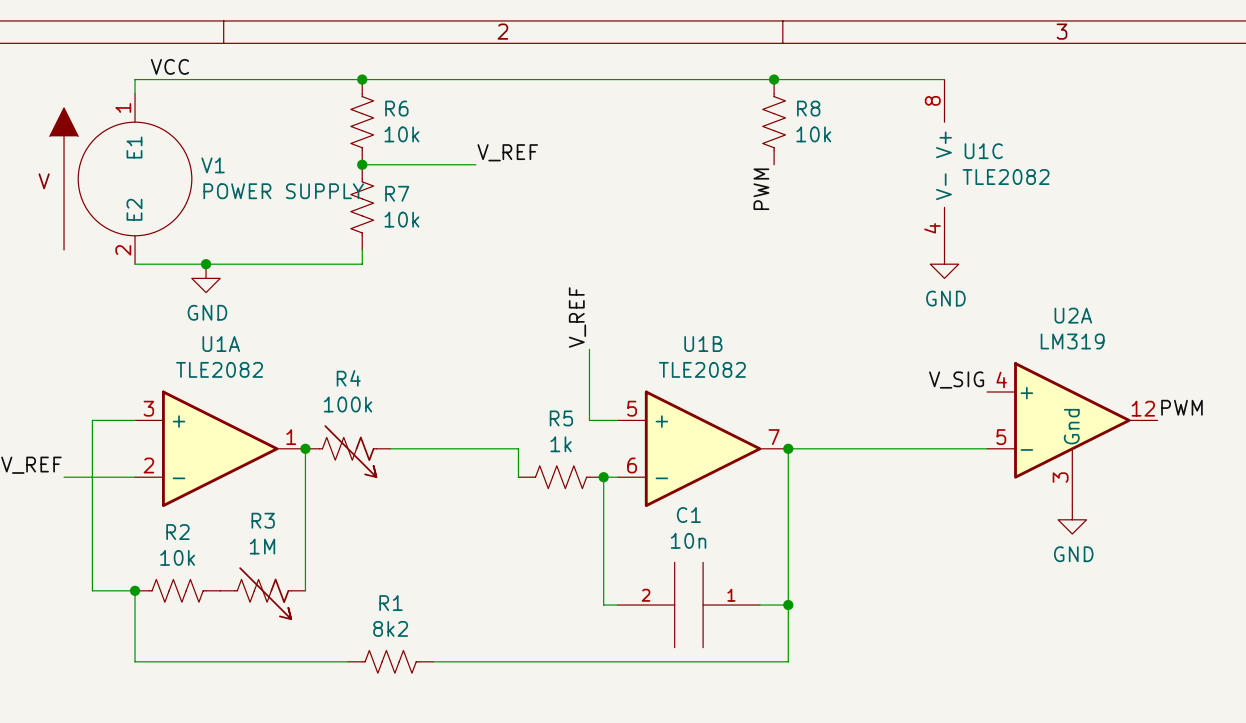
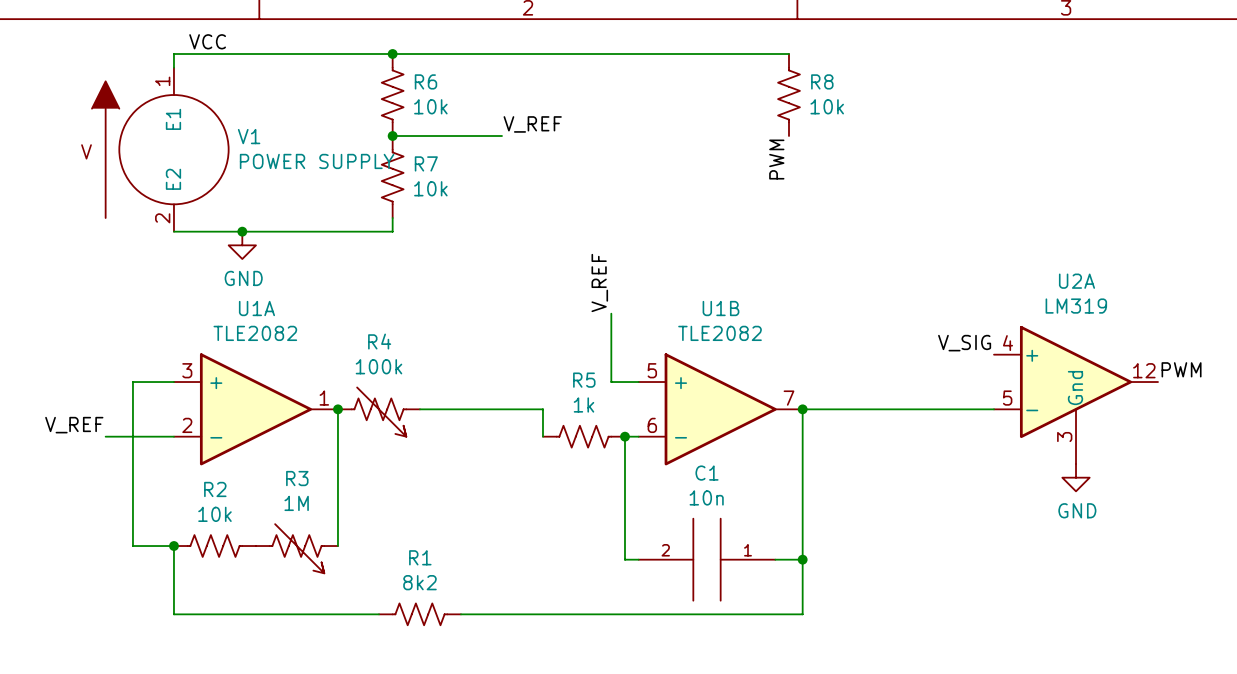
wire: (774, 79) (944, 79) -> none
junction: (774, 79) -> none
U1C: TLE2082 (944, 164) -> none
power symbol: GND (944, 264) -> none

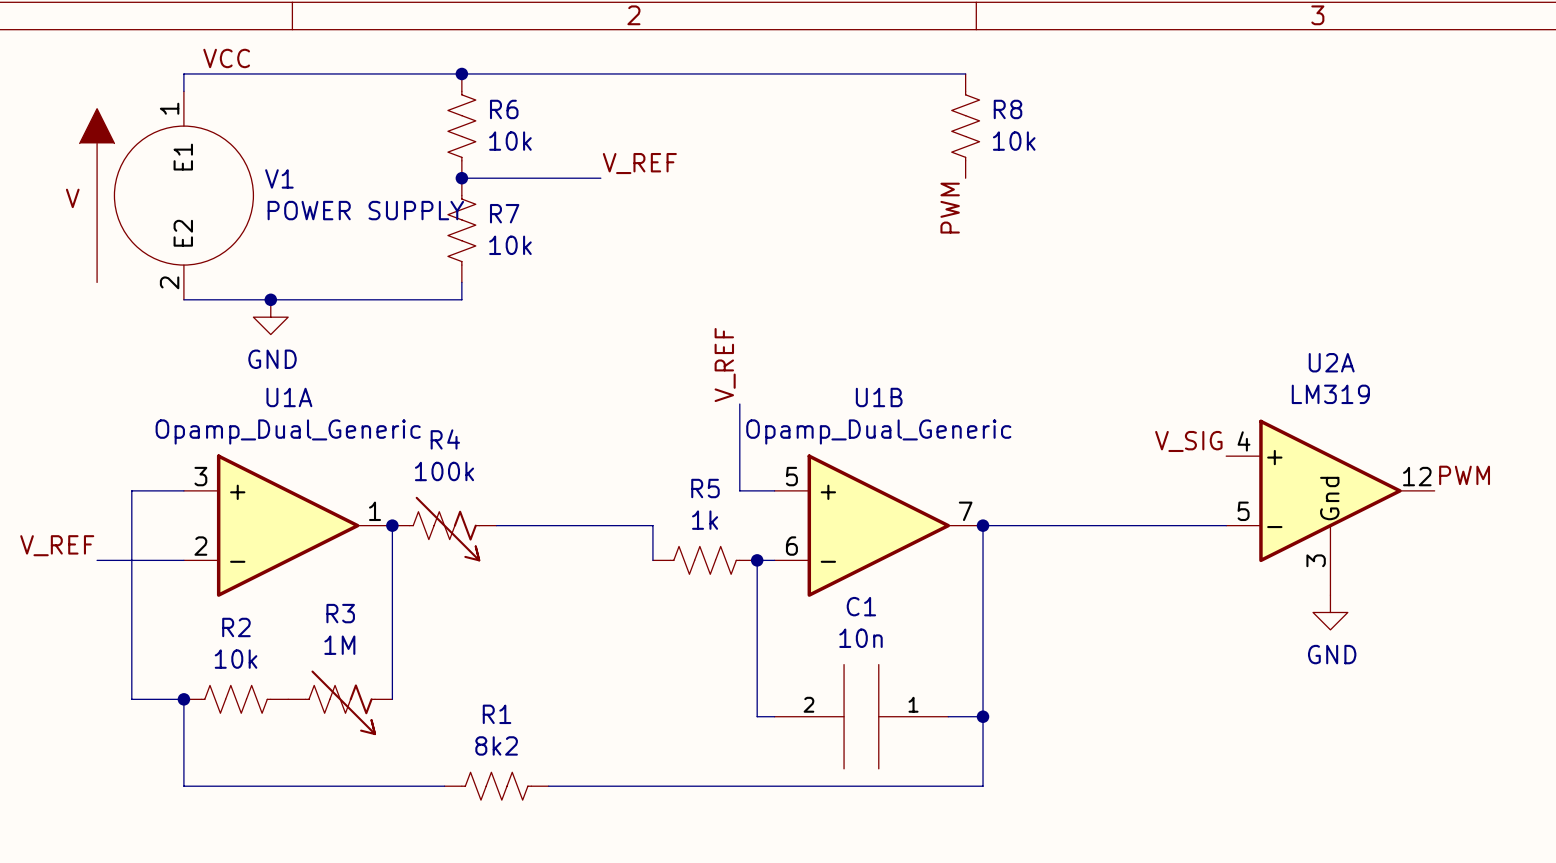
U1A value: TLE2082 (255, 333) -> Opamp_Dual_Generic (288, 431)
U1B value: TLE2082 (720, 333) -> Opamp_Dual_Generic (878, 431)

